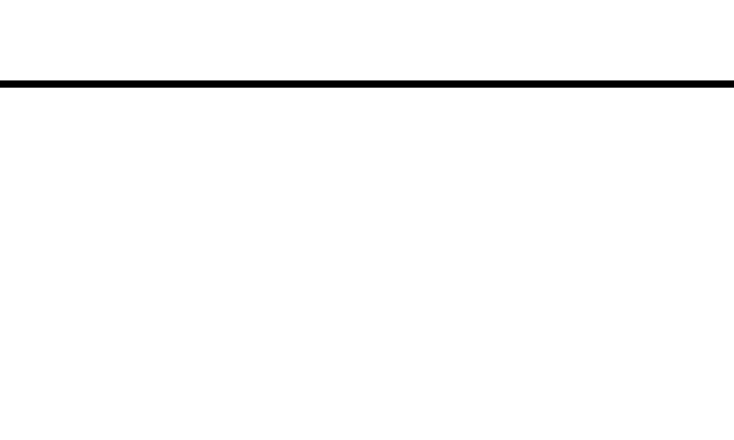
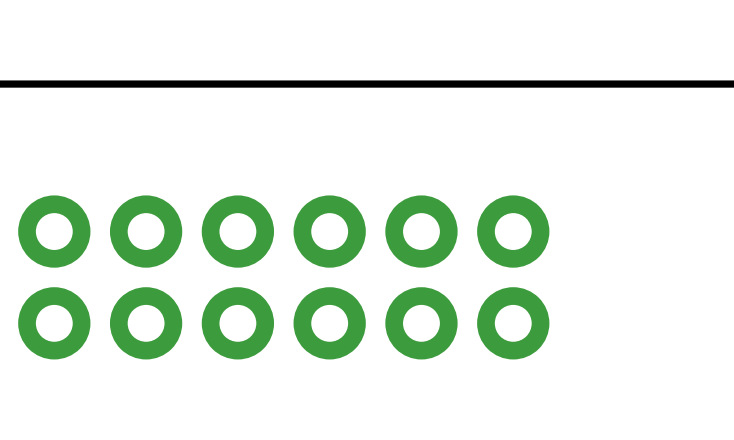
part: none -> (283, 277)

